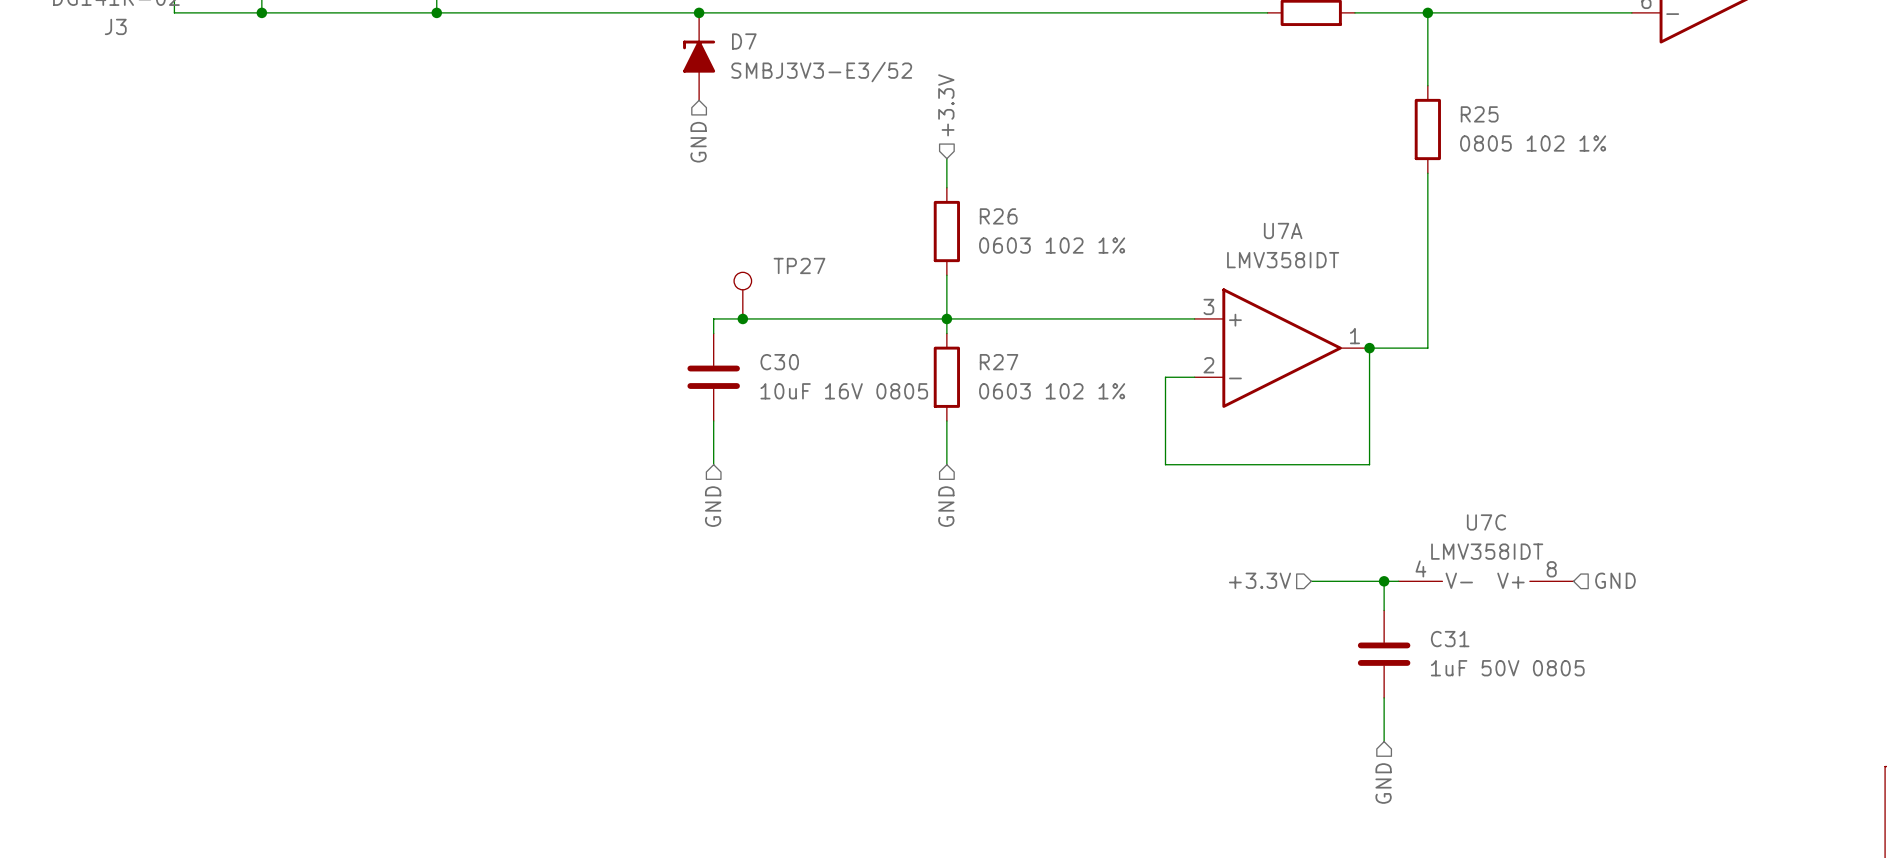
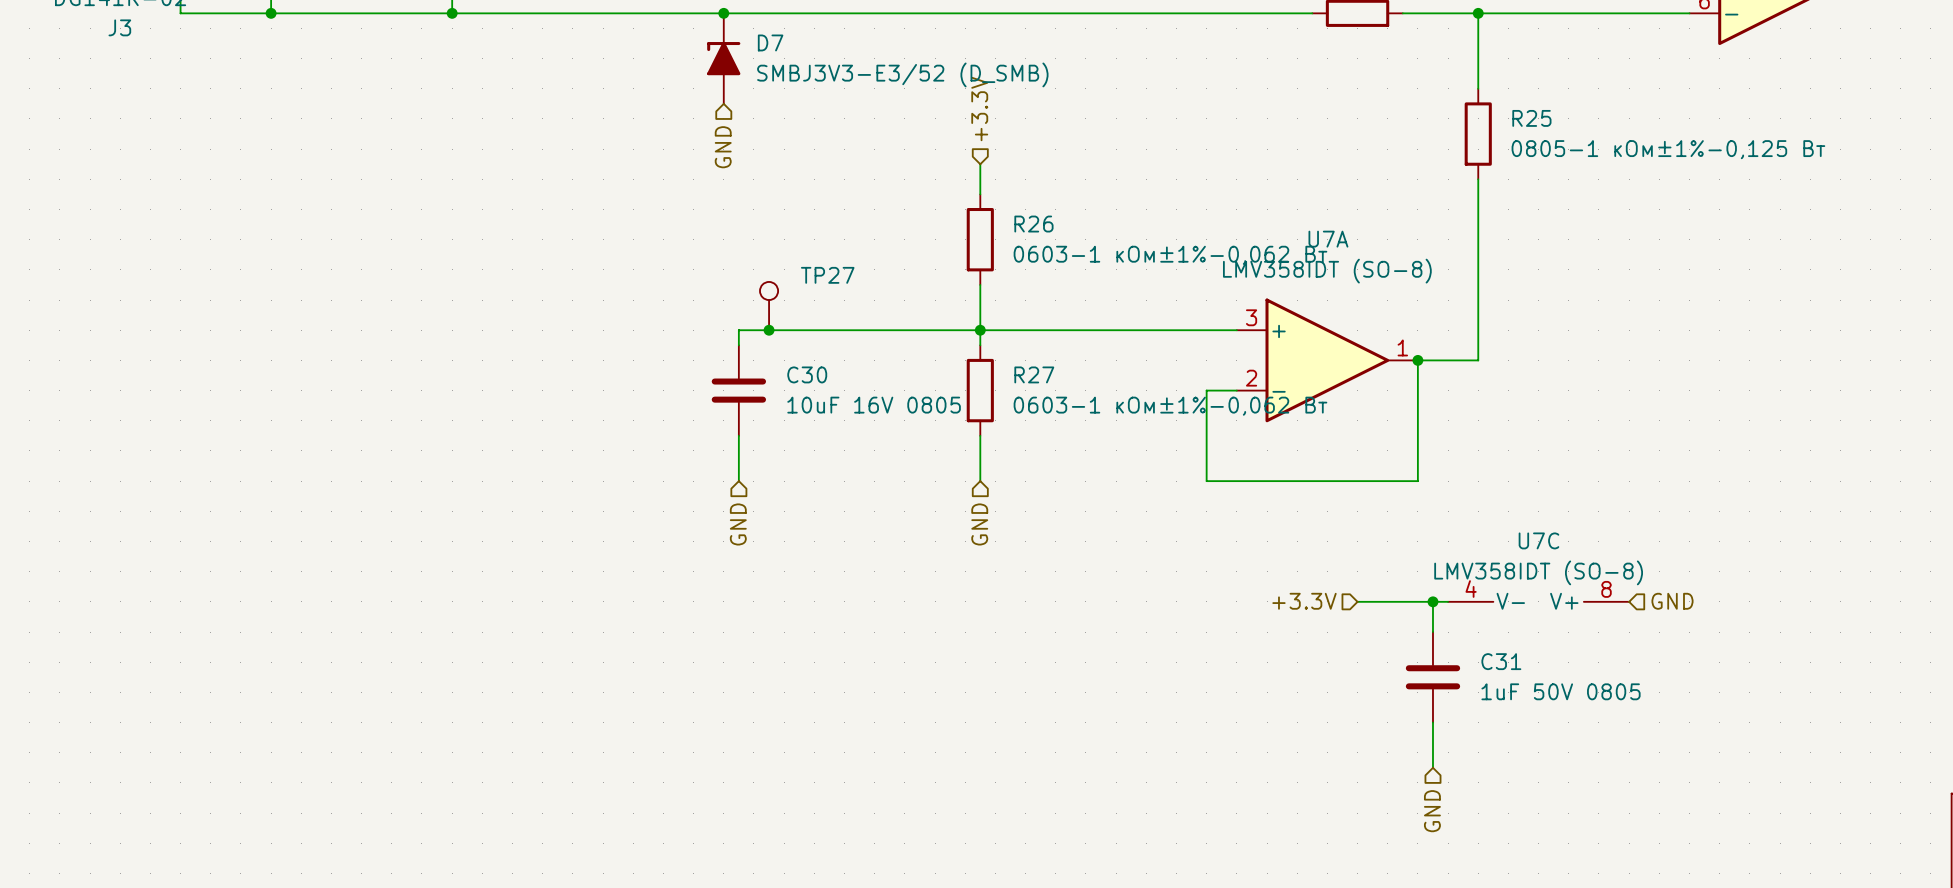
D7 value: SMBJ3V3-E3/52 (821, 72) -> SMBJ3V3-E3/52 (D_SMB) (902, 74)
R25 value: 0805 102 1% (1533, 143) -> 0805-1 кОм±1%-0,125 Вт (1668, 149)
R26 value: 0603 102 1% (1052, 245) -> 0603-1 кОм±1%-0,062 Вт (1170, 255)
U7A value: LMV358IDT (1283, 260) -> LMV358IDT (SO-8) (1327, 271)
R27 value: 0603 102 1% (1052, 391) -> 0603-1 кОм±1%-0,062 Вт (1170, 406)
U7C value: LMV358IDT (1487, 551) -> LMV358IDT (SO-8) (1538, 572)

